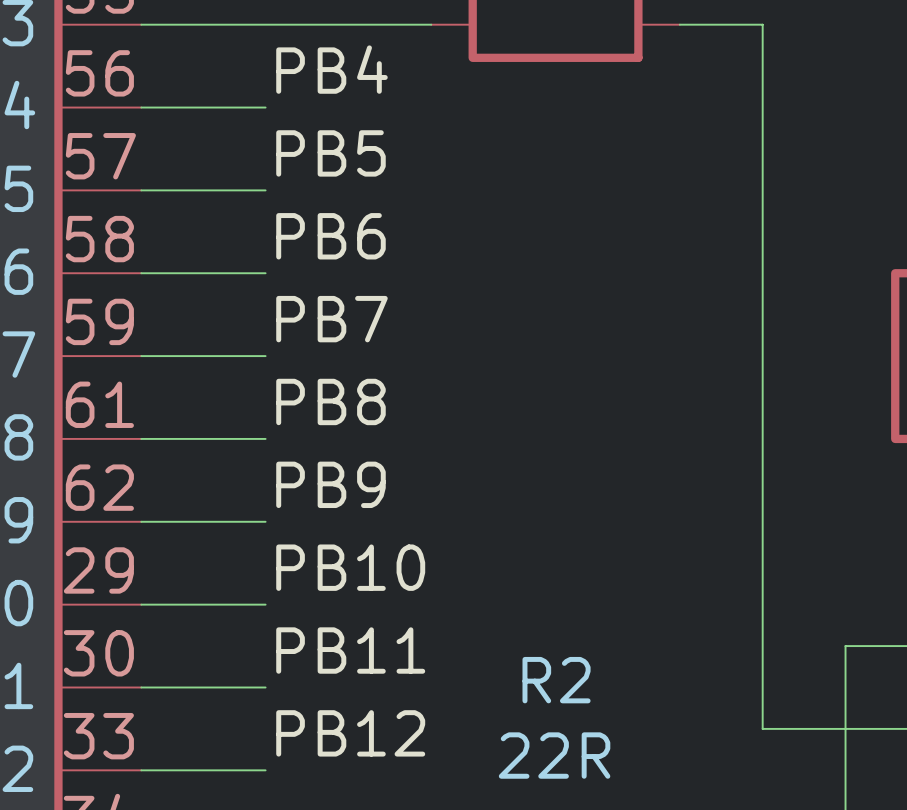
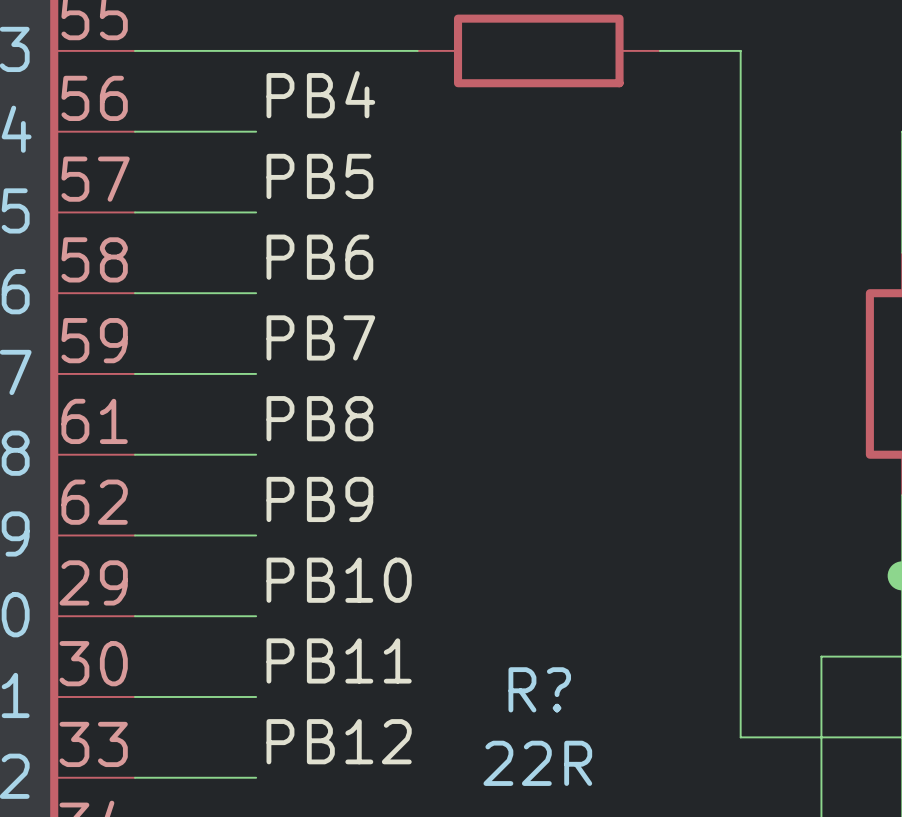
R2 name: R2 (556, 680) -> R? (539, 689)

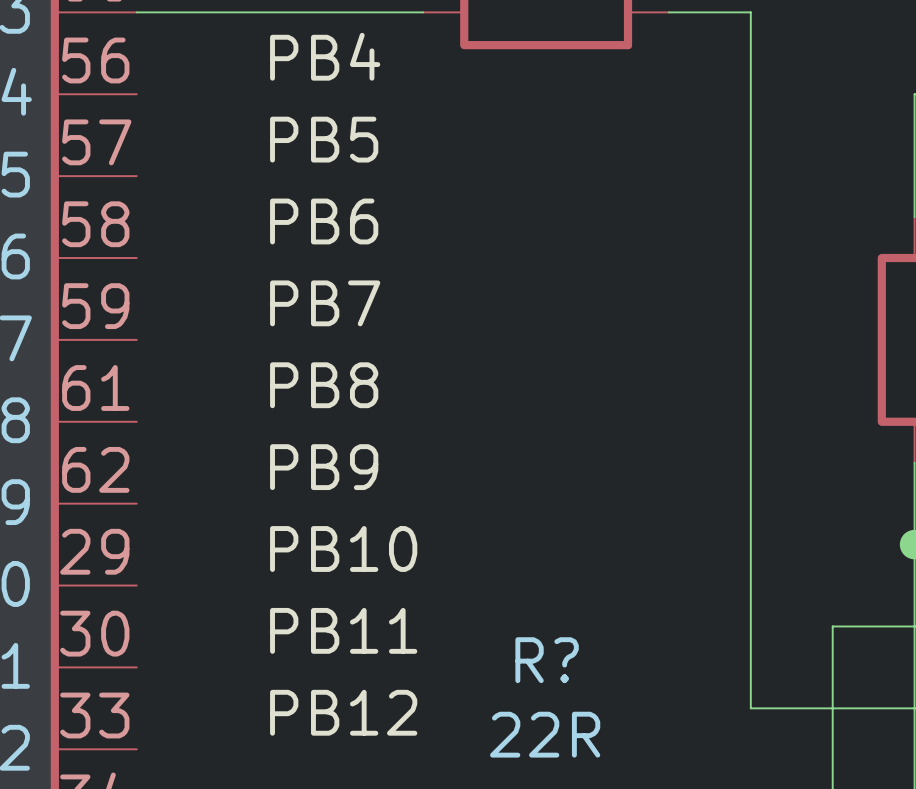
wire: (134, 131) (256, 131) -> none
wire: (134, 212) (256, 212) -> none
wire: (134, 293) (256, 293) -> none
wire: (134, 373) (256, 373) -> none
wire: (134, 454) (256, 454) -> none
wire: (134, 535) (256, 535) -> none
wire: (134, 616) (256, 616) -> none
wire: (134, 696) (256, 696) -> none
wire: (134, 777) (256, 777) -> none

